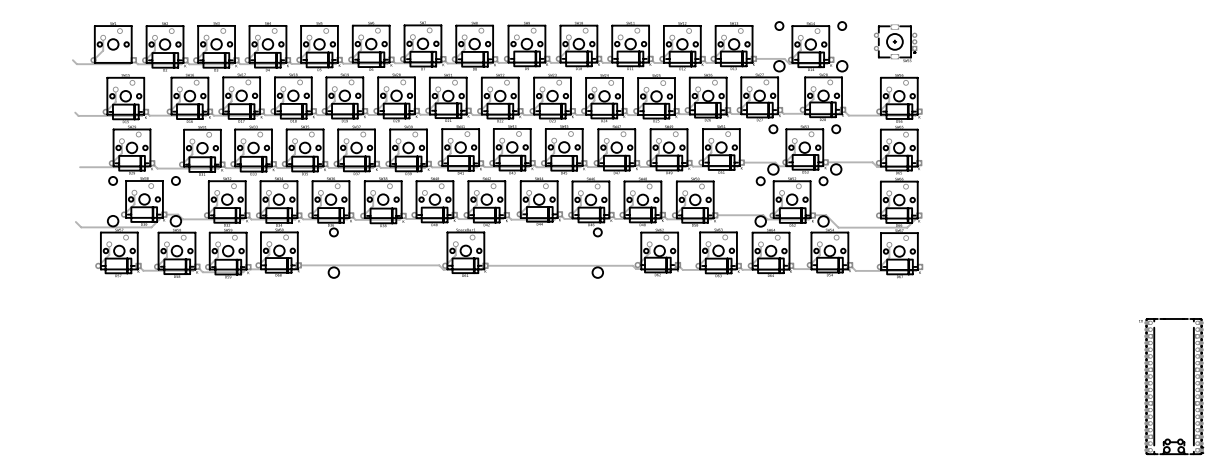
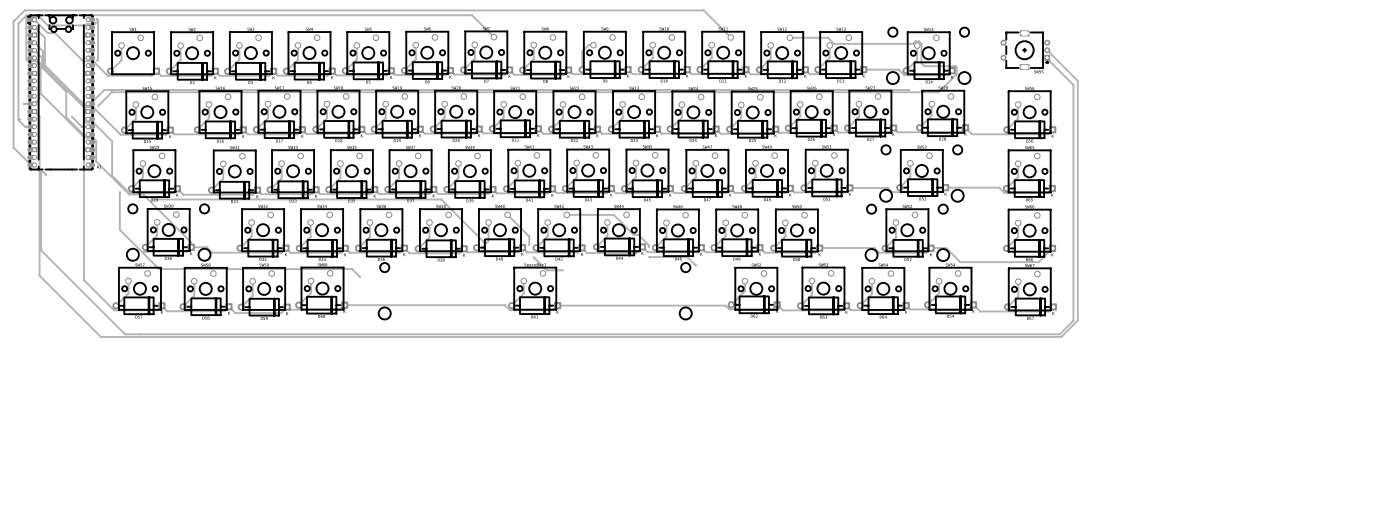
track: none -> (96, 19) (97, 60)
track: none -> (96, 22) (85, 25) (47, 25) (38, 16) (26, 17) (26, 59) (28, 61) (36, 61) (39, 64) (39, 98) (34, 103) (23, 103)
track: none -> (493, 37) (472, 15) (26, 15) (18, 23) (18, 120) (25, 126) (34, 126)
track: none -> (730, 37) (703, 10) (24, 10) (13, 21) (13, 147) (31, 165) (34, 165)
track: none -> (789, 37) (828, 37) (834, 43) (913, 43) (918, 41) (921, 43) (921, 63) (924, 66) (955, 66) (956, 74) (938, 92) (111, 92) (98, 105)
track: none -> (593, 45) (588, 45) (582, 51) (582, 69)
track: none -> (711, 45) (711, 57) (700, 69)
track: none -> (32, 50) (41, 57) (41, 67) (66, 91) (66, 117) (86, 137) (93, 137) (96, 140) (96, 161) (129, 194) (143, 194) (191, 242) (191, 247)
track: none -> (1047, 50) (1077, 80) (1077, 320) (1061, 336) (100, 336) (39, 275) (39, 116) (34, 111)
track: none -> (34, 58) (40, 64) (40, 93) (83, 136) (83, 280) (114, 310) (157, 310) (161, 305)
track: none -> (1047, 57) (1073, 85) (1073, 320) (1059, 334) (125, 334) (40, 250)
track: (72, 60) (76, 64) (91, 64) -> (34, 19) (47, 33) (55, 33) (83, 61) (93, 61) (107, 75)
track: none -> (909, 89) (104, 89) (90, 103)
track: none -> (72, 117) (82, 126) (88, 126)
via: none -> (20, 119)
track: (75, 112) (78, 115) (102, 115) -> (34, 27) (44, 37) (44, 65) (86, 107) (93, 107) (120, 134)
track: none -> (46, 174) (41, 172) (41, 250)
track: none -> (119, 192) (119, 229) (159, 269) (352, 269) (359, 276)
track: (80, 167) (110, 167) -> (34, 42) (43, 51) (43, 66) (84, 107) (84, 122) (93, 122) (112, 141) (112, 175) (129, 193)
track: none -> (153, 199) (441, 199) (484, 242)
track: none -> (507, 214) (529, 236) (529, 244)
track: none -> (566, 214) (613, 214) (633, 234) (638, 234) (648, 247)
track: none -> (488, 222) (488, 240) (481, 247) (476, 247)
track: (160, 218) (151, 227) (81, 227) (75, 222) -> (186, 251) (143, 251)
track: none -> (534, 257) (546, 270) (562, 270)
track: none -> (649, 257) (687, 257) (695, 265)
part rotation: 0° (1174, 386) -> 180° (61, 92)
part position: (1174, 386) -> (61, 92)

